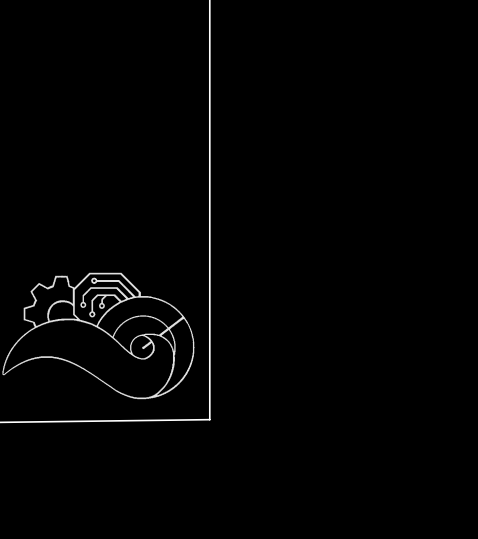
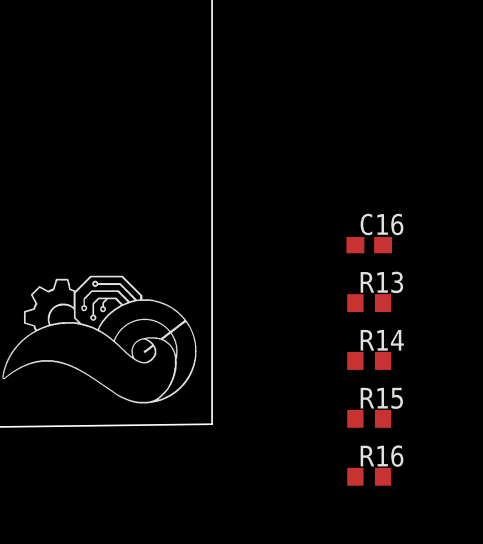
C16: none -> (369, 245)
R13: none -> (369, 303)
R14: none -> (369, 360)
R15: none -> (369, 418)
R16: none -> (369, 476)

